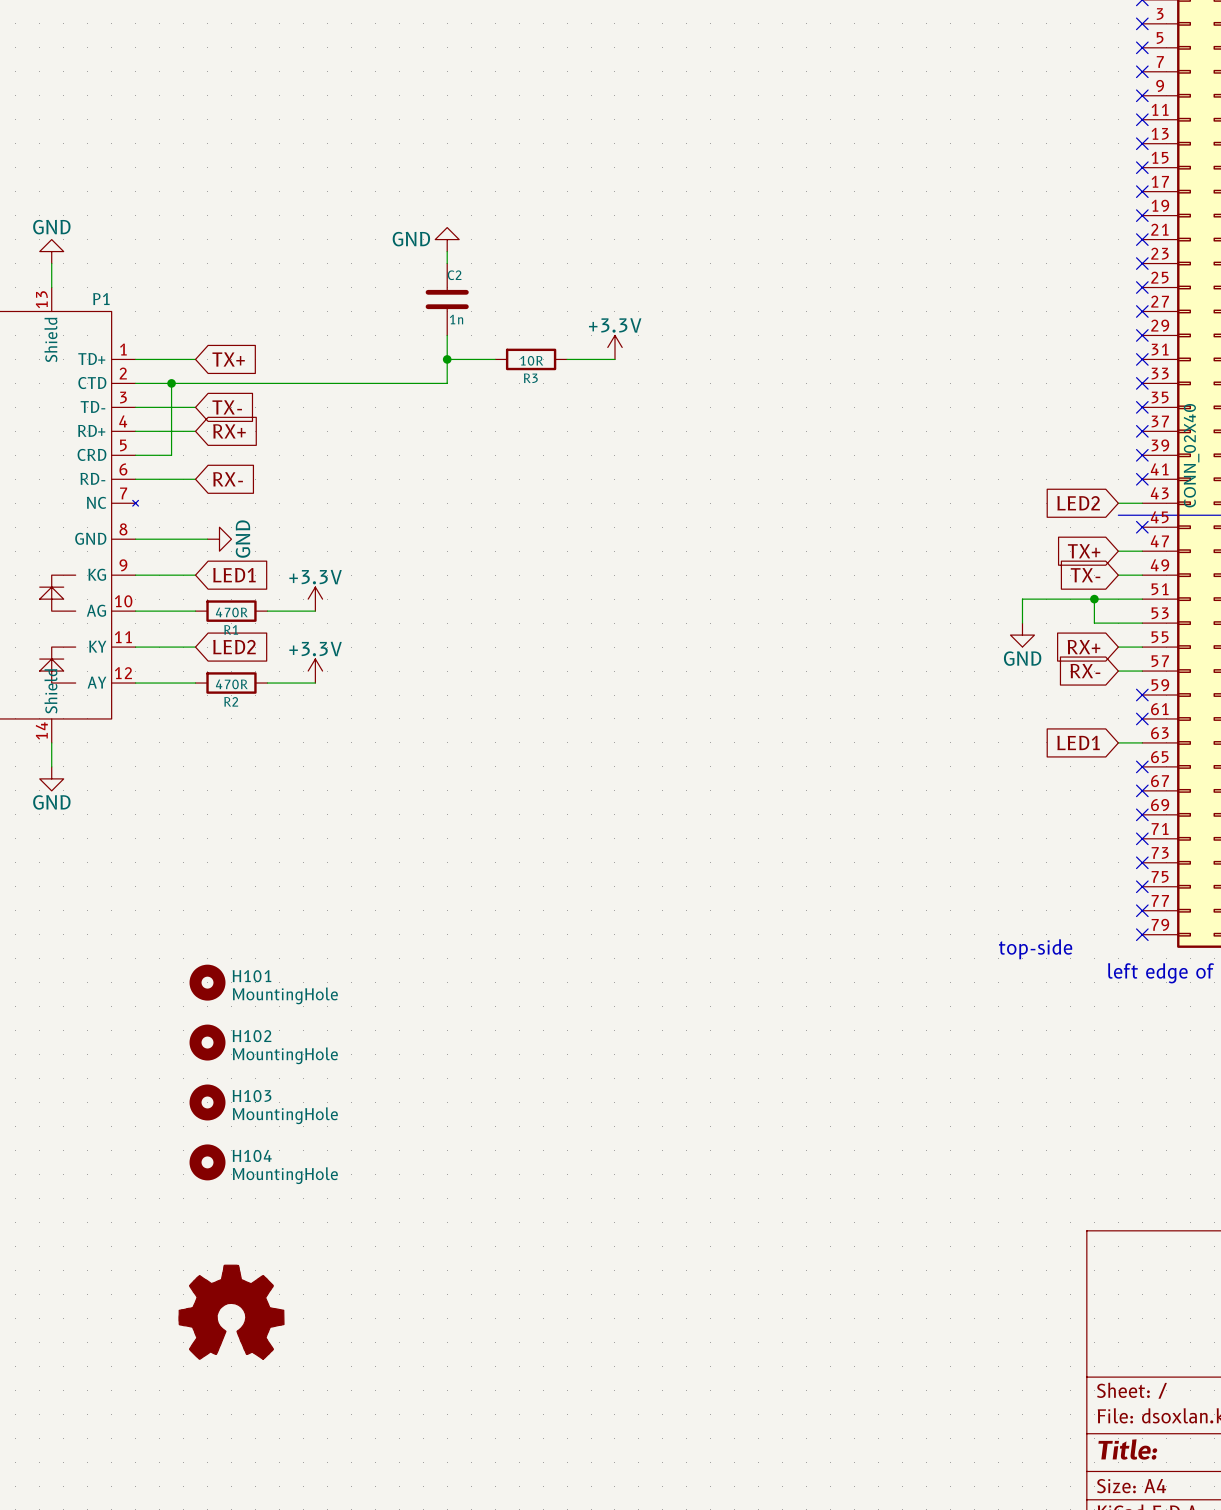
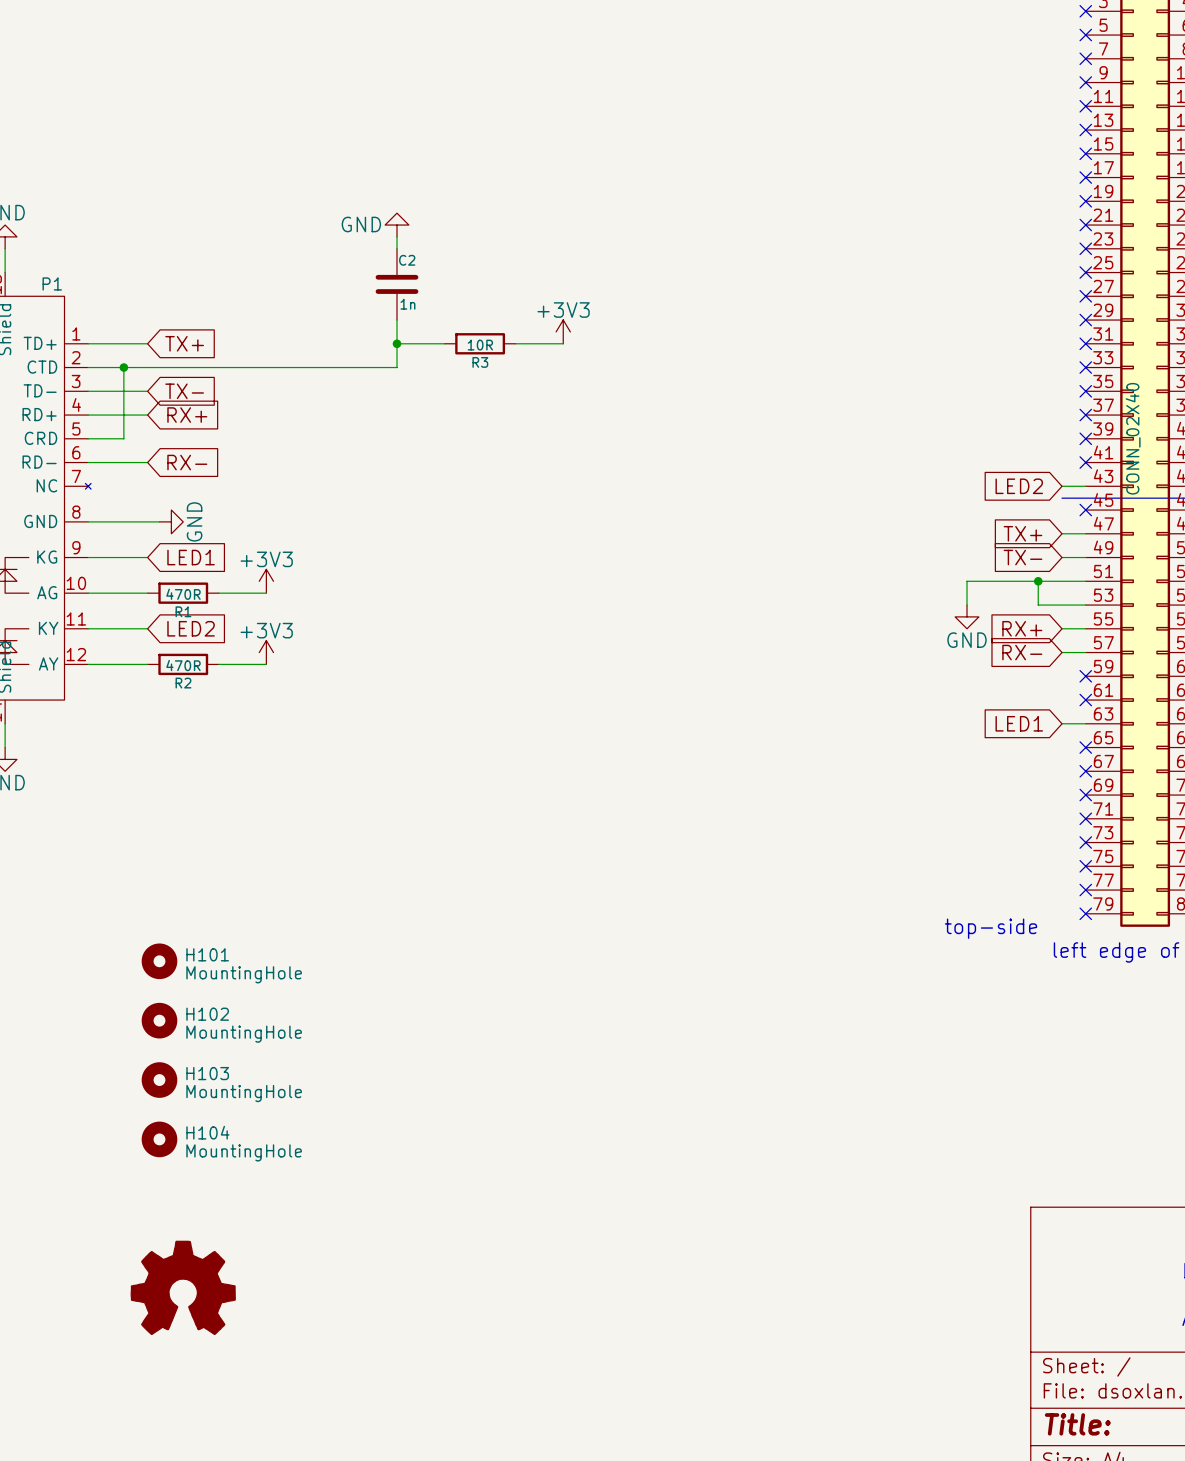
power symbol: +3.3V (614, 347) -> +3V3 (563, 331)
power symbol: +3.3V (315, 599) -> +3V3 (266, 581)
power symbol: +3.3V (315, 671) -> +3V3 (266, 652)

